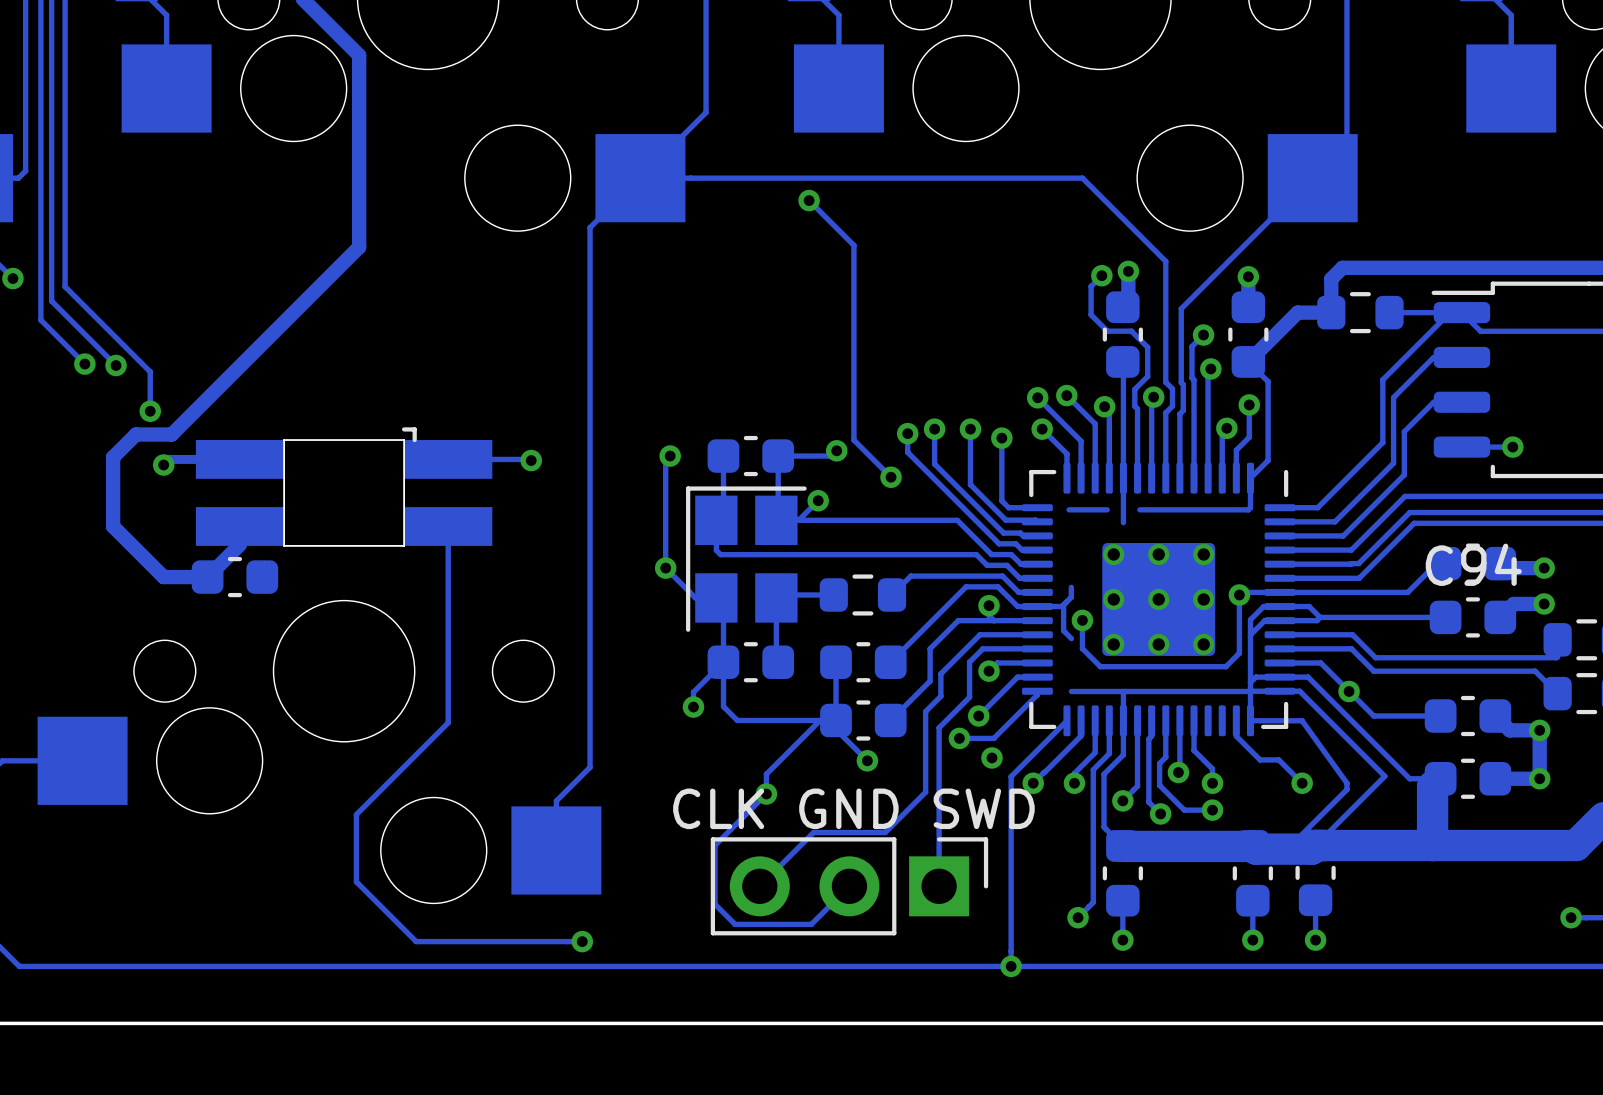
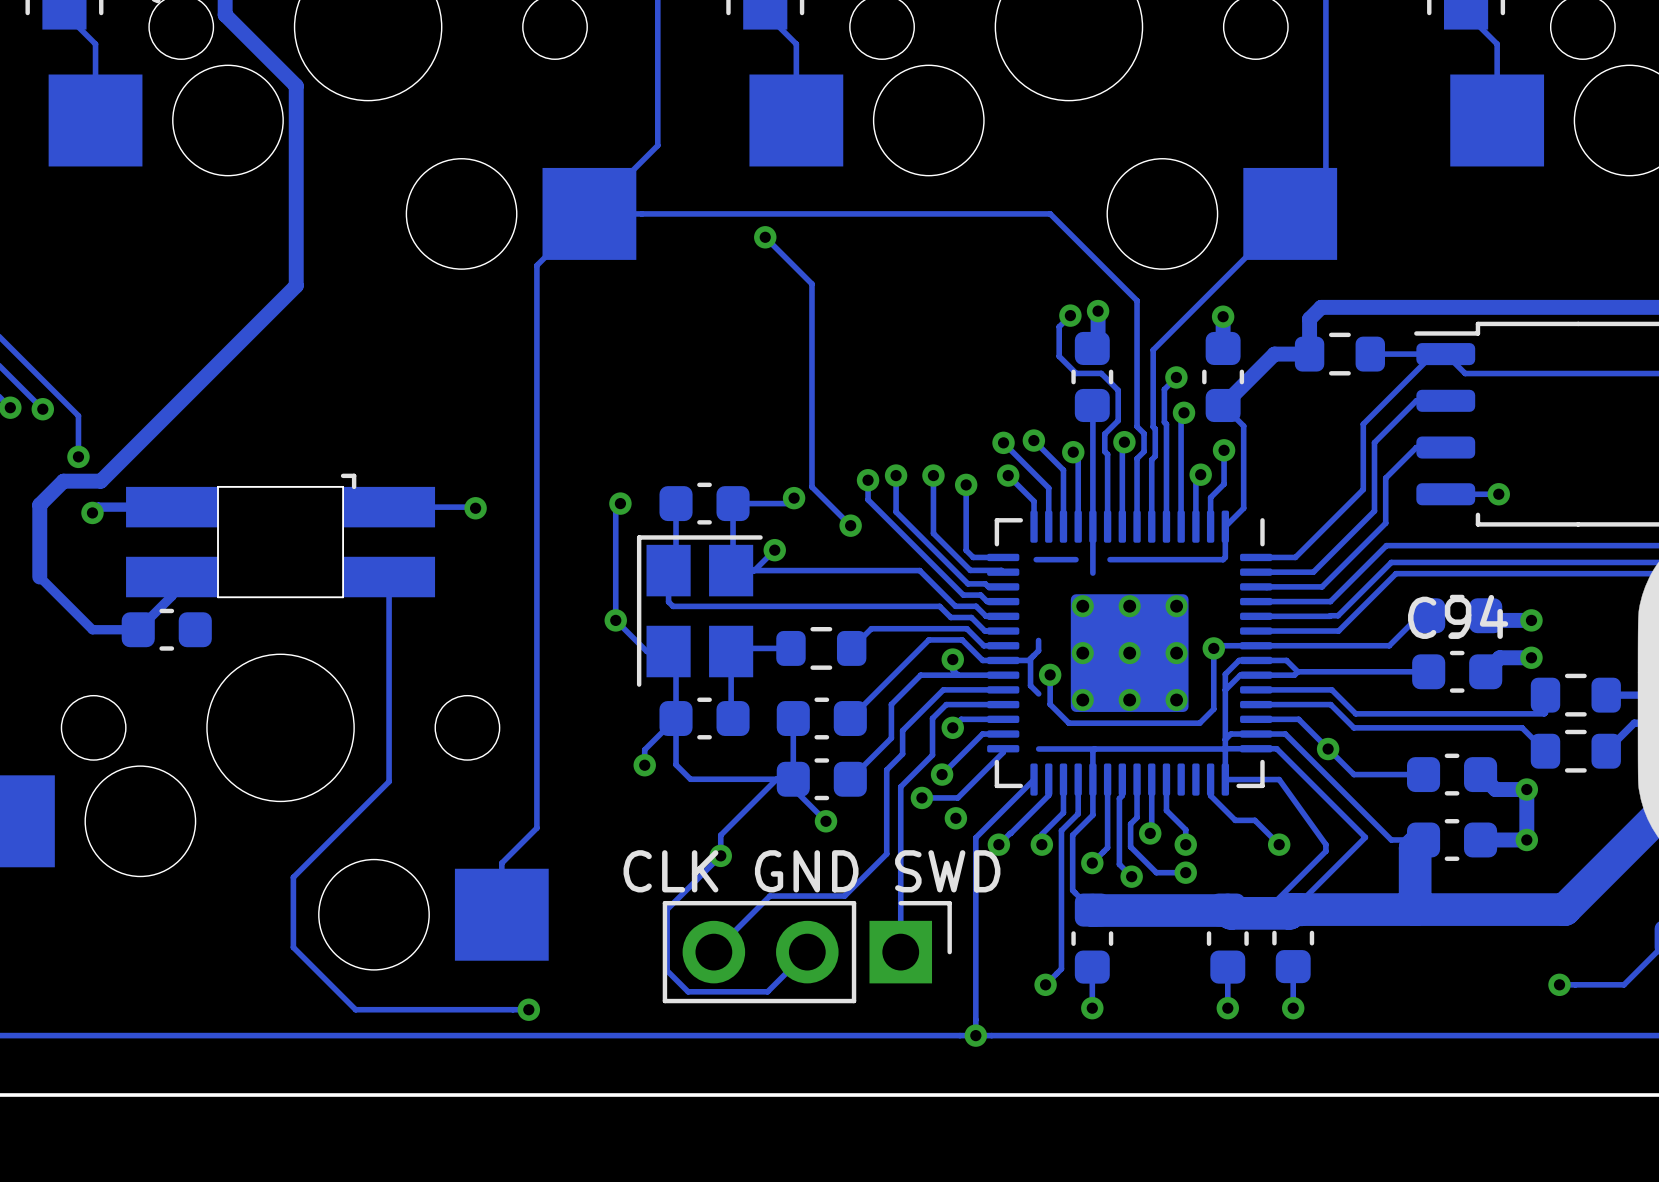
track width: thick (113, 526) (163, 577) (207, 577) (239, 544) -> thin (39, 577) (92, 629) (138, 629) (172, 595)

